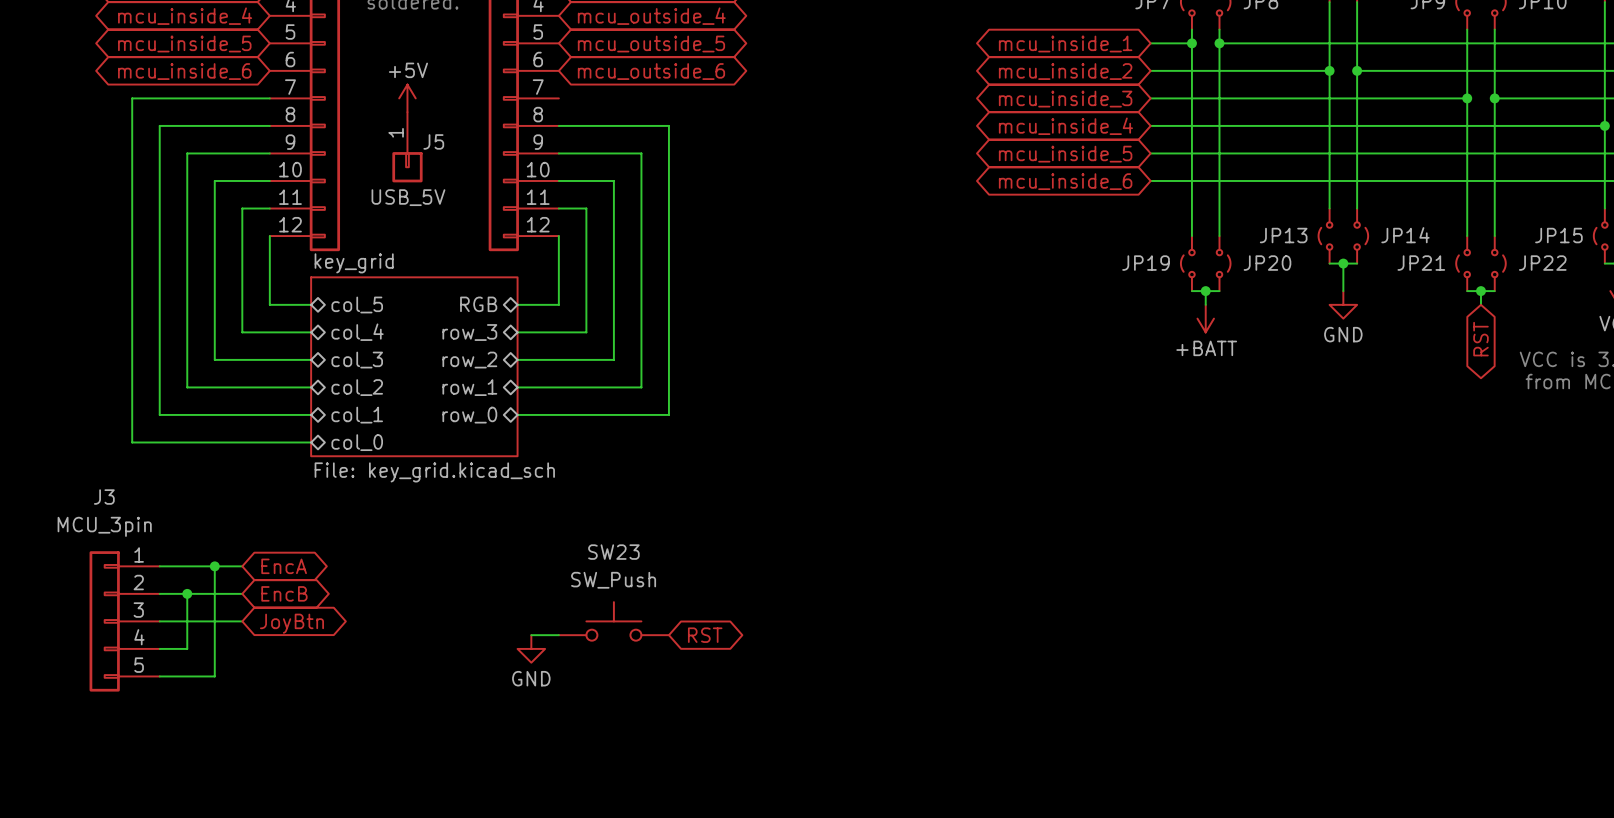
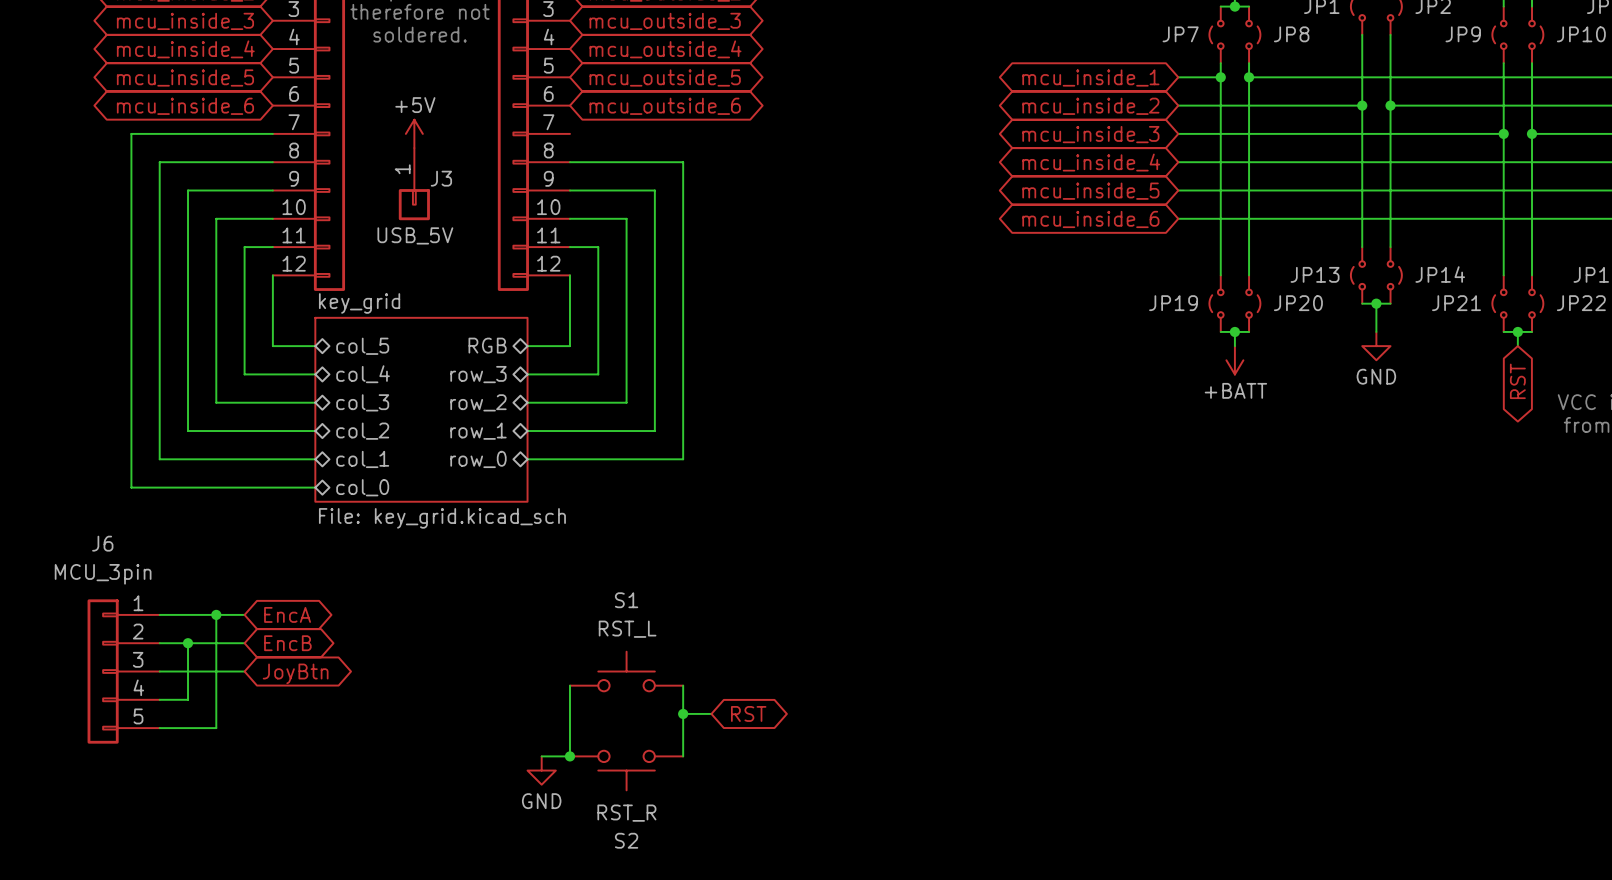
J5 name: J5 (433, 141) -> J3 (441, 178)
J3 name: J3 (104, 497) -> J6 (102, 543)
SW23 name: SW23 (613, 552) -> S1 (626, 600)
SW23 value: SW_Push (613, 580) -> RST_L (627, 629)
wire: (531, 635) (558, 635) -> (541, 756) (569, 756) (569, 685)
wire: none -> (683, 685) (683, 756)
global label position: RST (705, 635) -> RST (748, 713)
power symbol position: GND (531, 648) -> GND (541, 770)
wire: none -> (683, 713) (711, 713)
junction: none -> (683, 713)
junction: none -> (569, 756)
S2: none -> RST_R (626, 770)

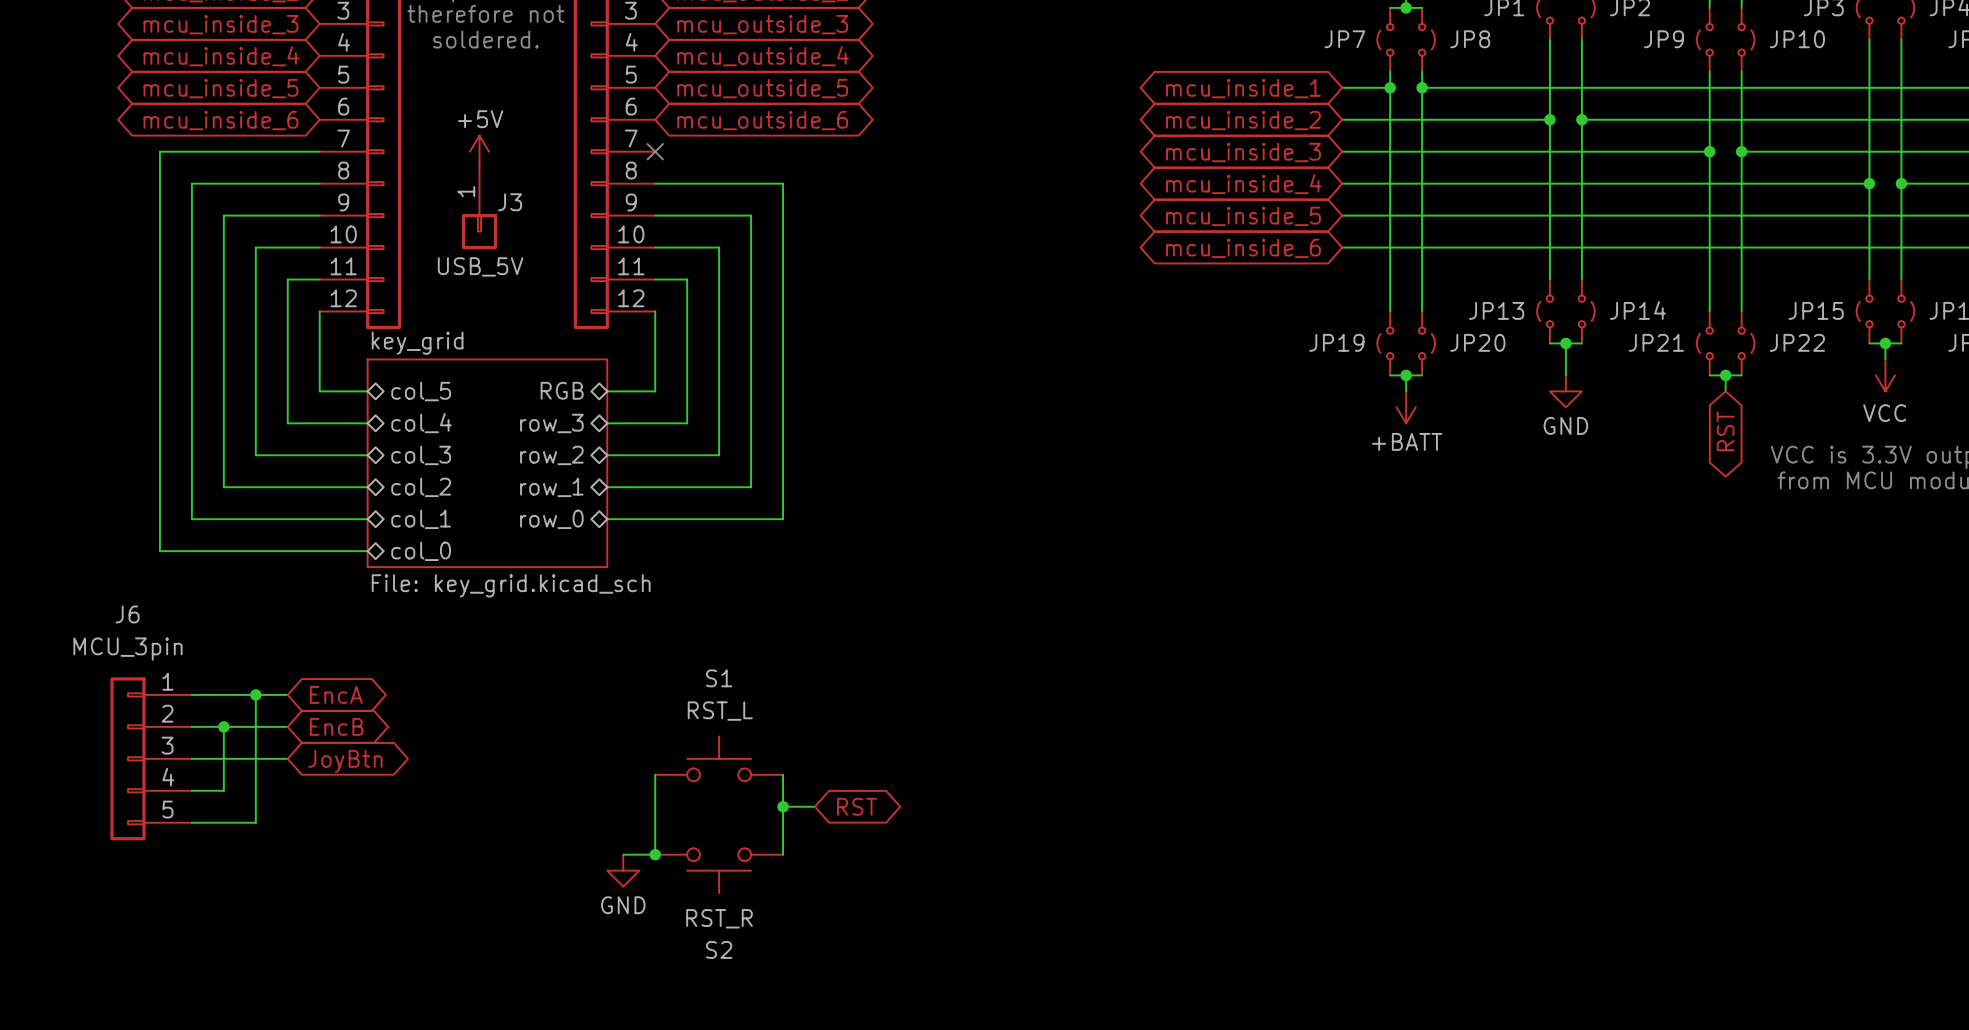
no-connect mark: none -> (655, 151)

